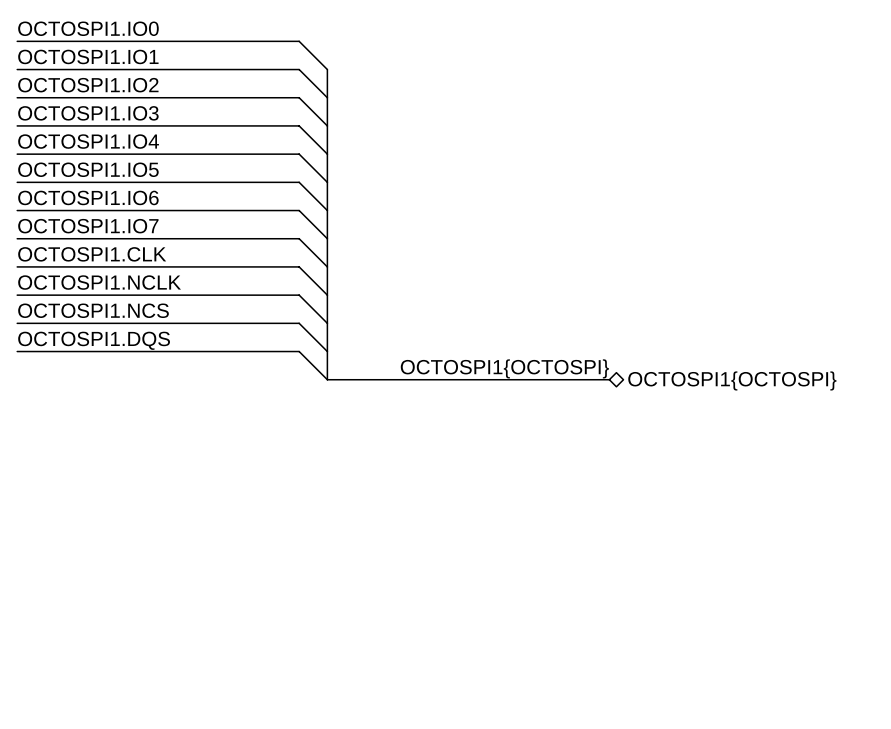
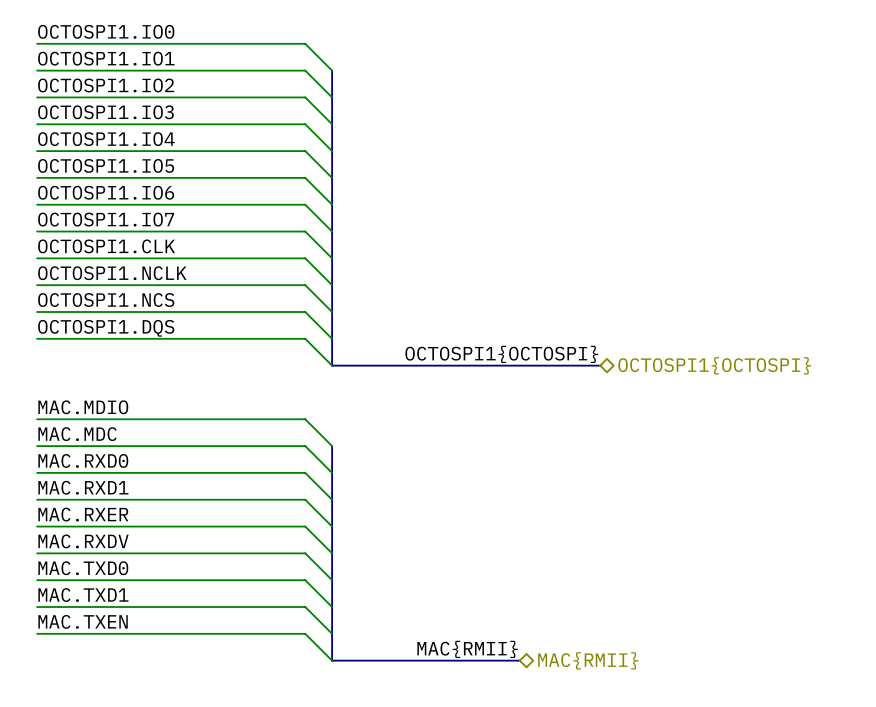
label: none -> MAC.MDIO (83, 407)
wire: none -> (37, 419) (305, 419) (332, 446)
label: none -> MAC.MDC (77, 434)
wire: none -> (37, 446) (305, 446) (332, 472)
bus: none -> (332, 446) (332, 660) (519, 660)
label: none -> MAC.RXD0 (83, 460)
wire: none -> (37, 472) (305, 472) (332, 499)
label: none -> MAC.RXD1 (83, 487)
wire: none -> (37, 499) (305, 499) (332, 526)
label: none -> MAC.RXER (83, 514)
wire: none -> (37, 526) (305, 526) (332, 553)
label: none -> MAC.RXDV (83, 541)
wire: none -> (37, 553) (305, 553) (332, 580)
label: none -> MAC.TXD0 (83, 568)
wire: none -> (37, 580) (305, 580) (332, 607)
label: none -> MAC.TXD1 (83, 595)
wire: none -> (37, 607) (305, 607) (332, 633)
label: none -> MAC.TXEN (83, 621)
wire: none -> (37, 633) (305, 633) (332, 660)
label: none -> MAC{RMII} (467, 649)
hierarchical label: none -> MAC{RMII} (588, 660)

